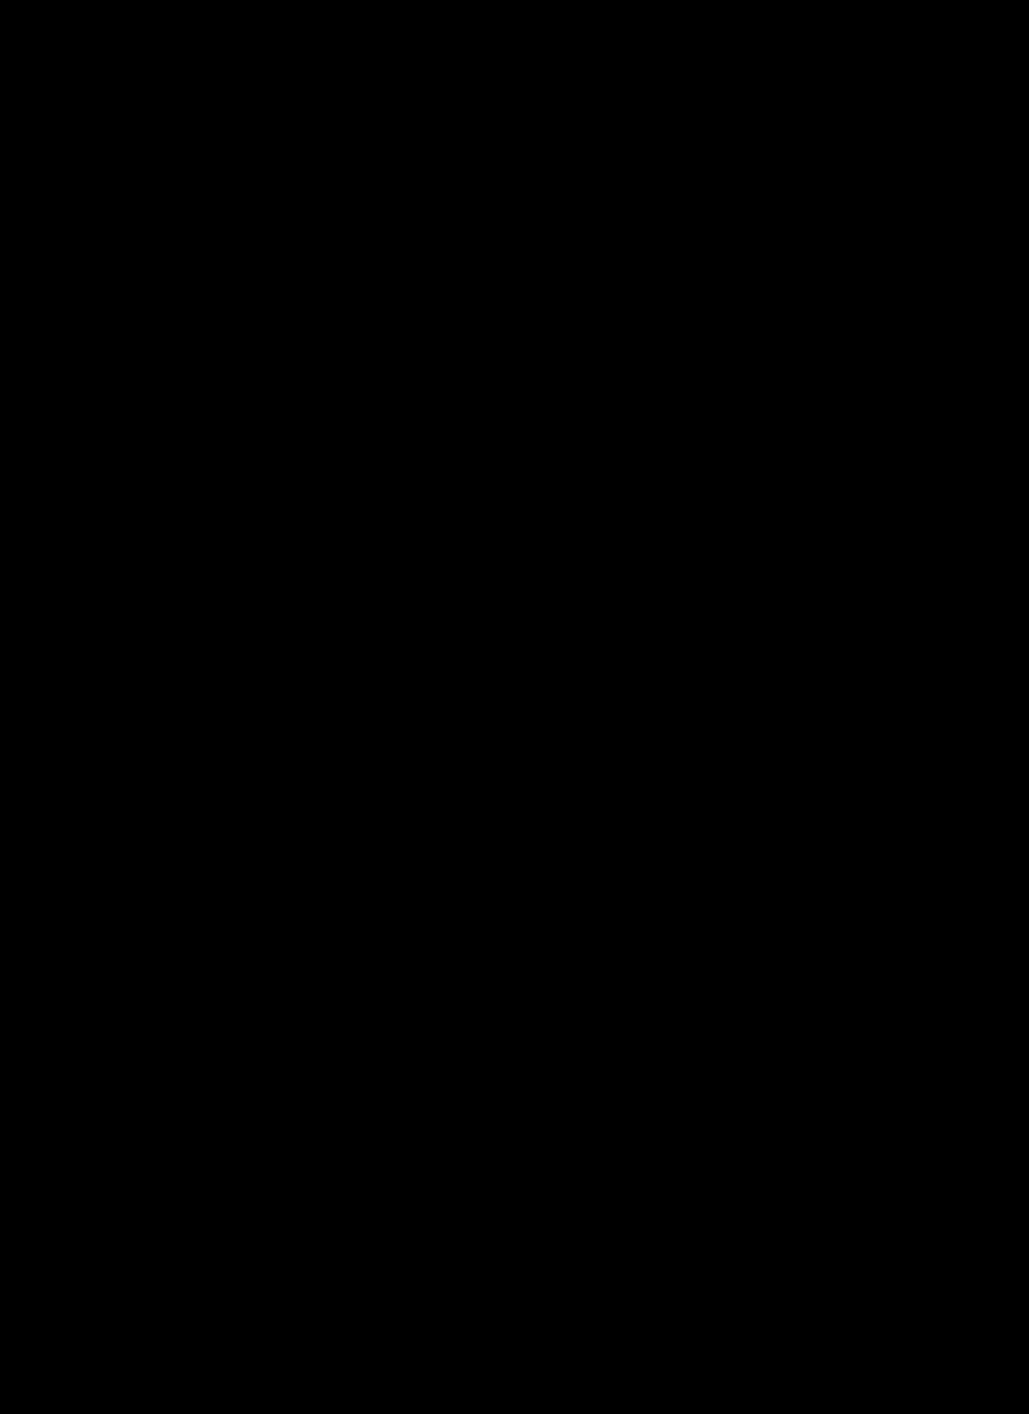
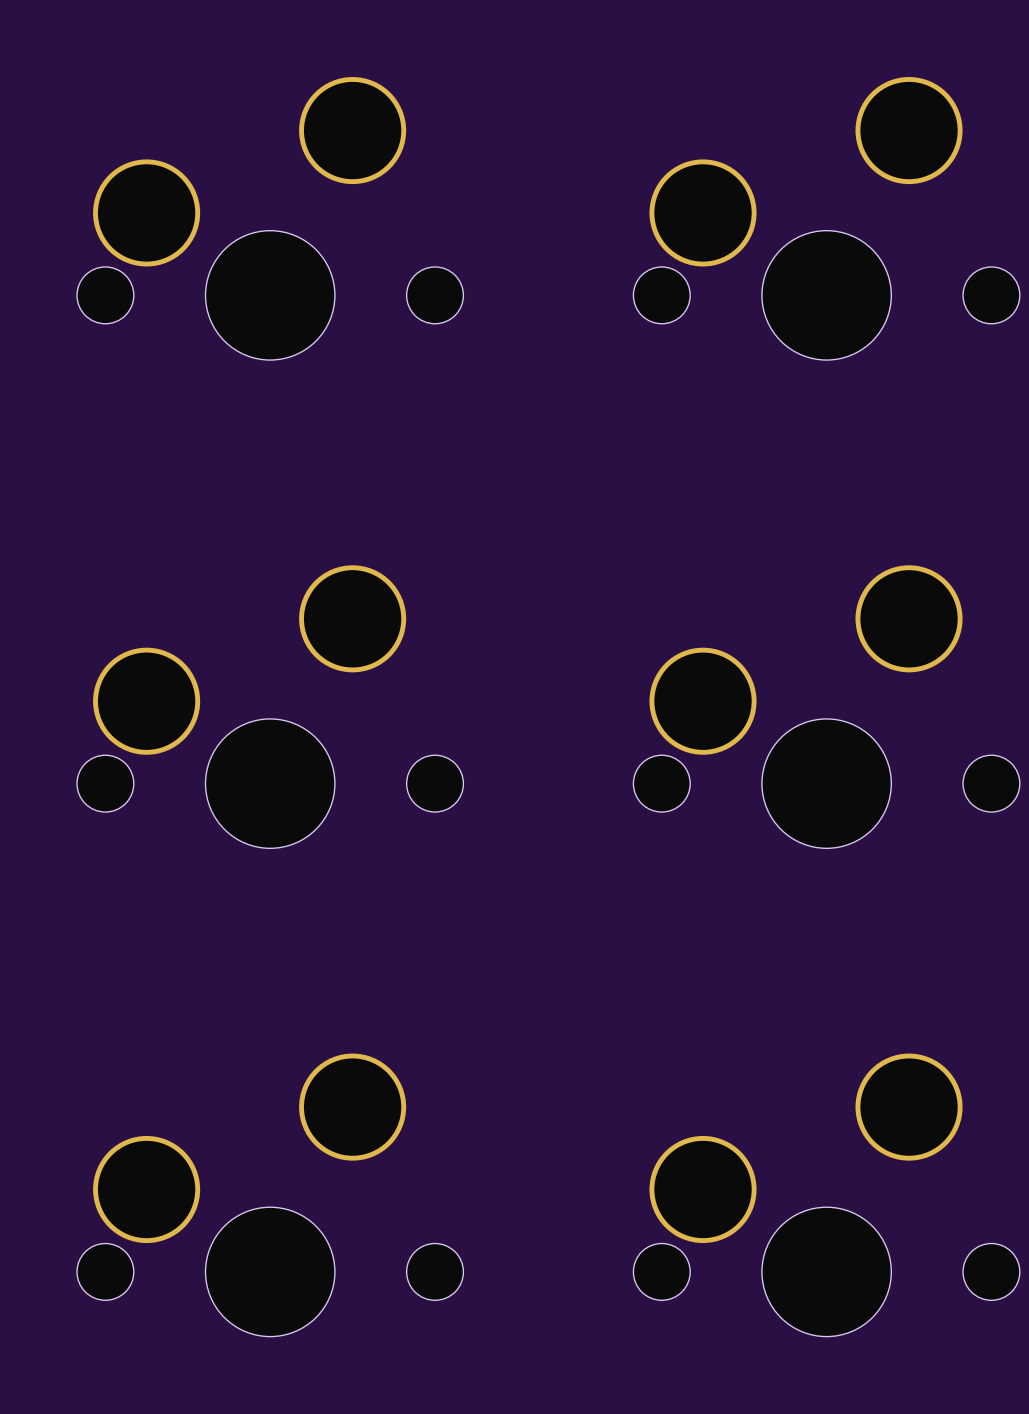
part: none -> (270, 218)
part: none -> (826, 218)
part: none -> (270, 706)
part: none -> (826, 706)
part: none -> (270, 1195)
part: none -> (826, 1195)

